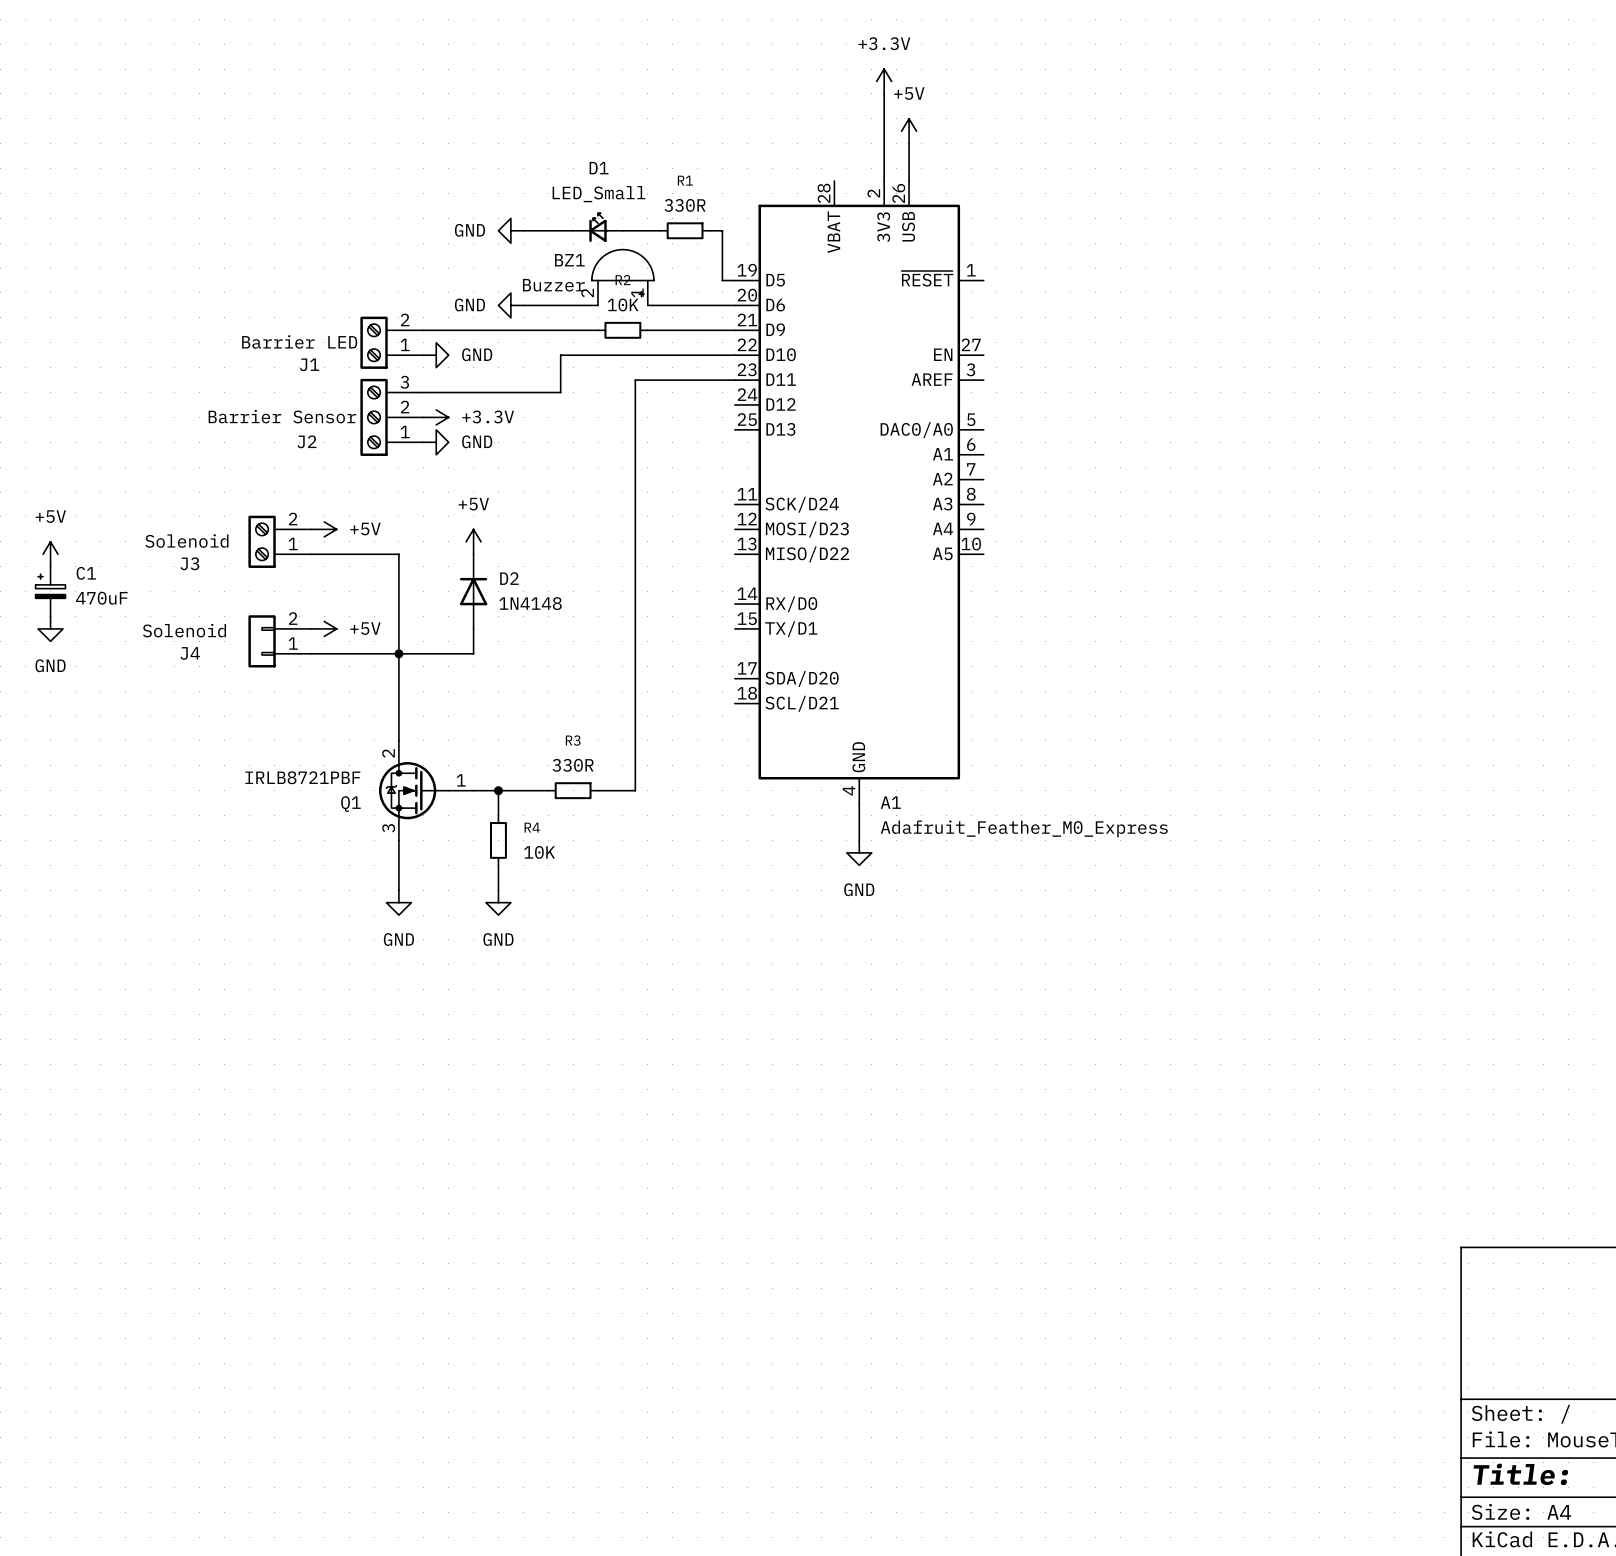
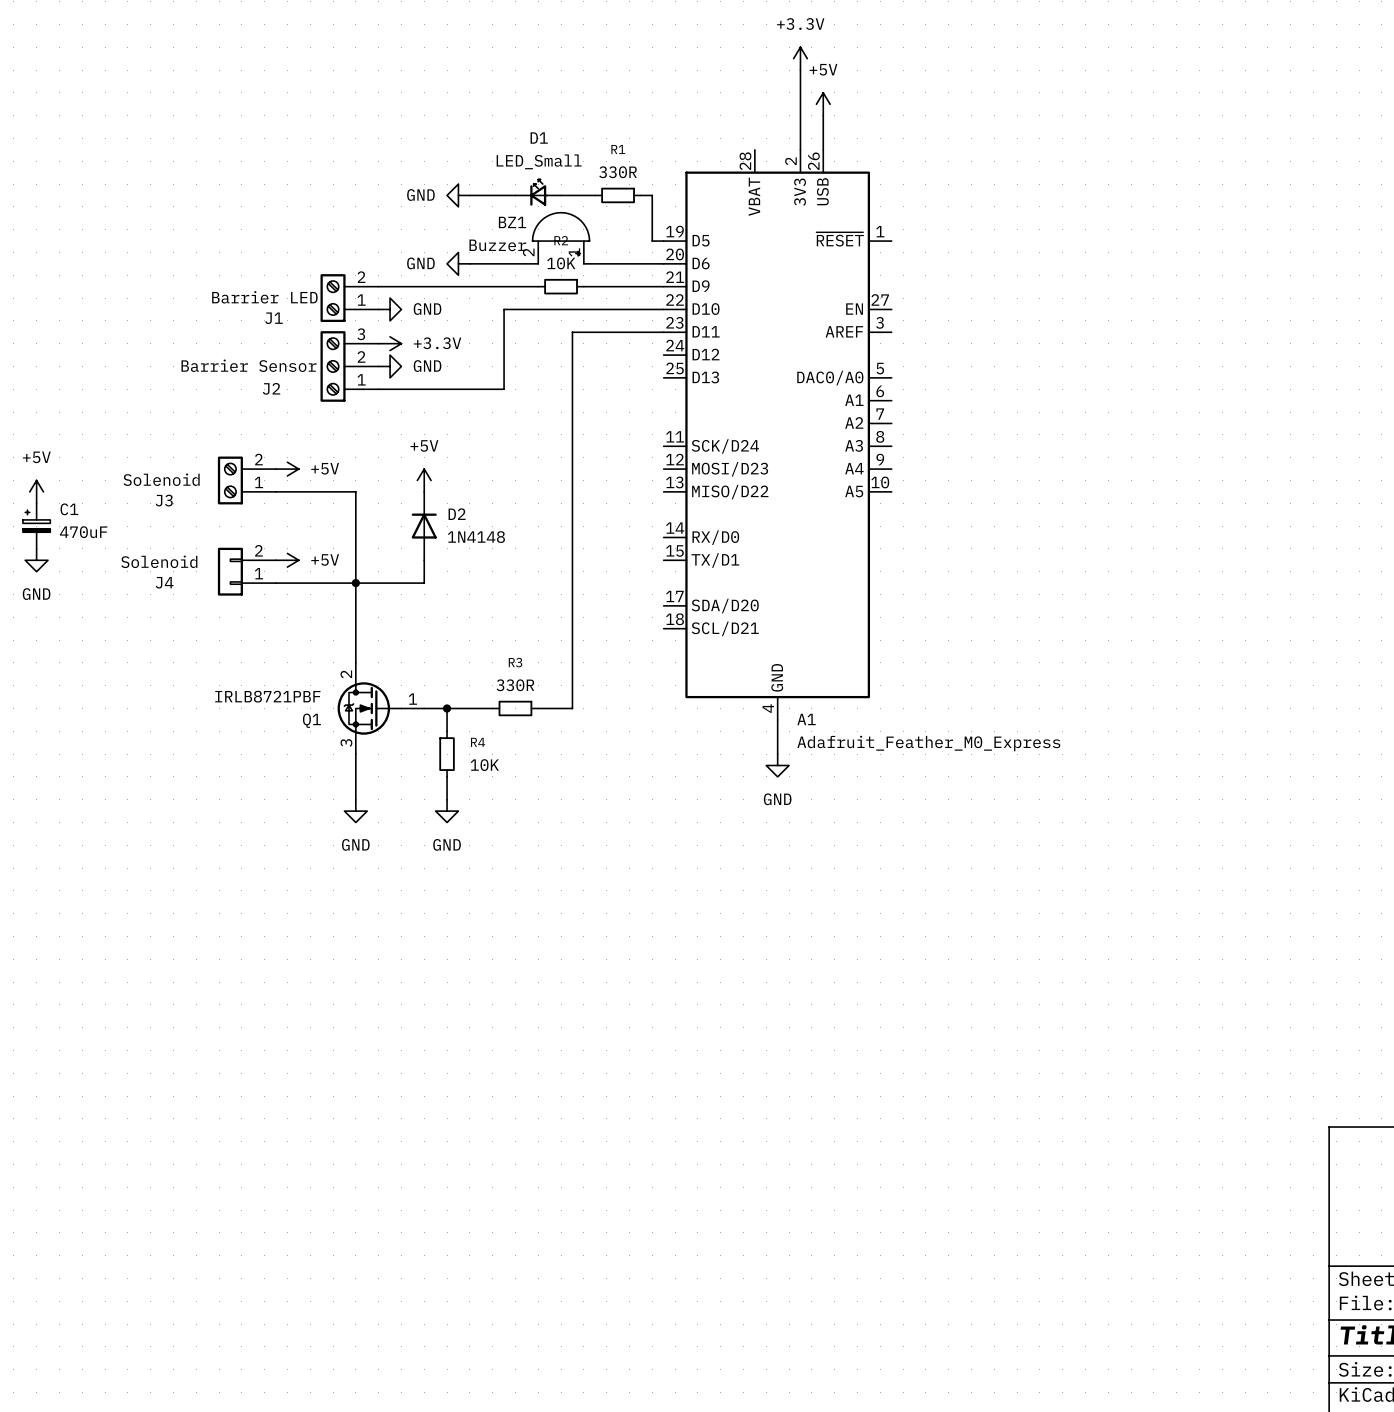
wire: (423, 392) (560, 392) -> (378, 389) (504, 389) (504, 343)
power symbol: none -> +3.3V (390, 343)
power symbol: +3.3V (436, 417) -> GND (390, 366)
power symbol: GND (436, 442) -> none

